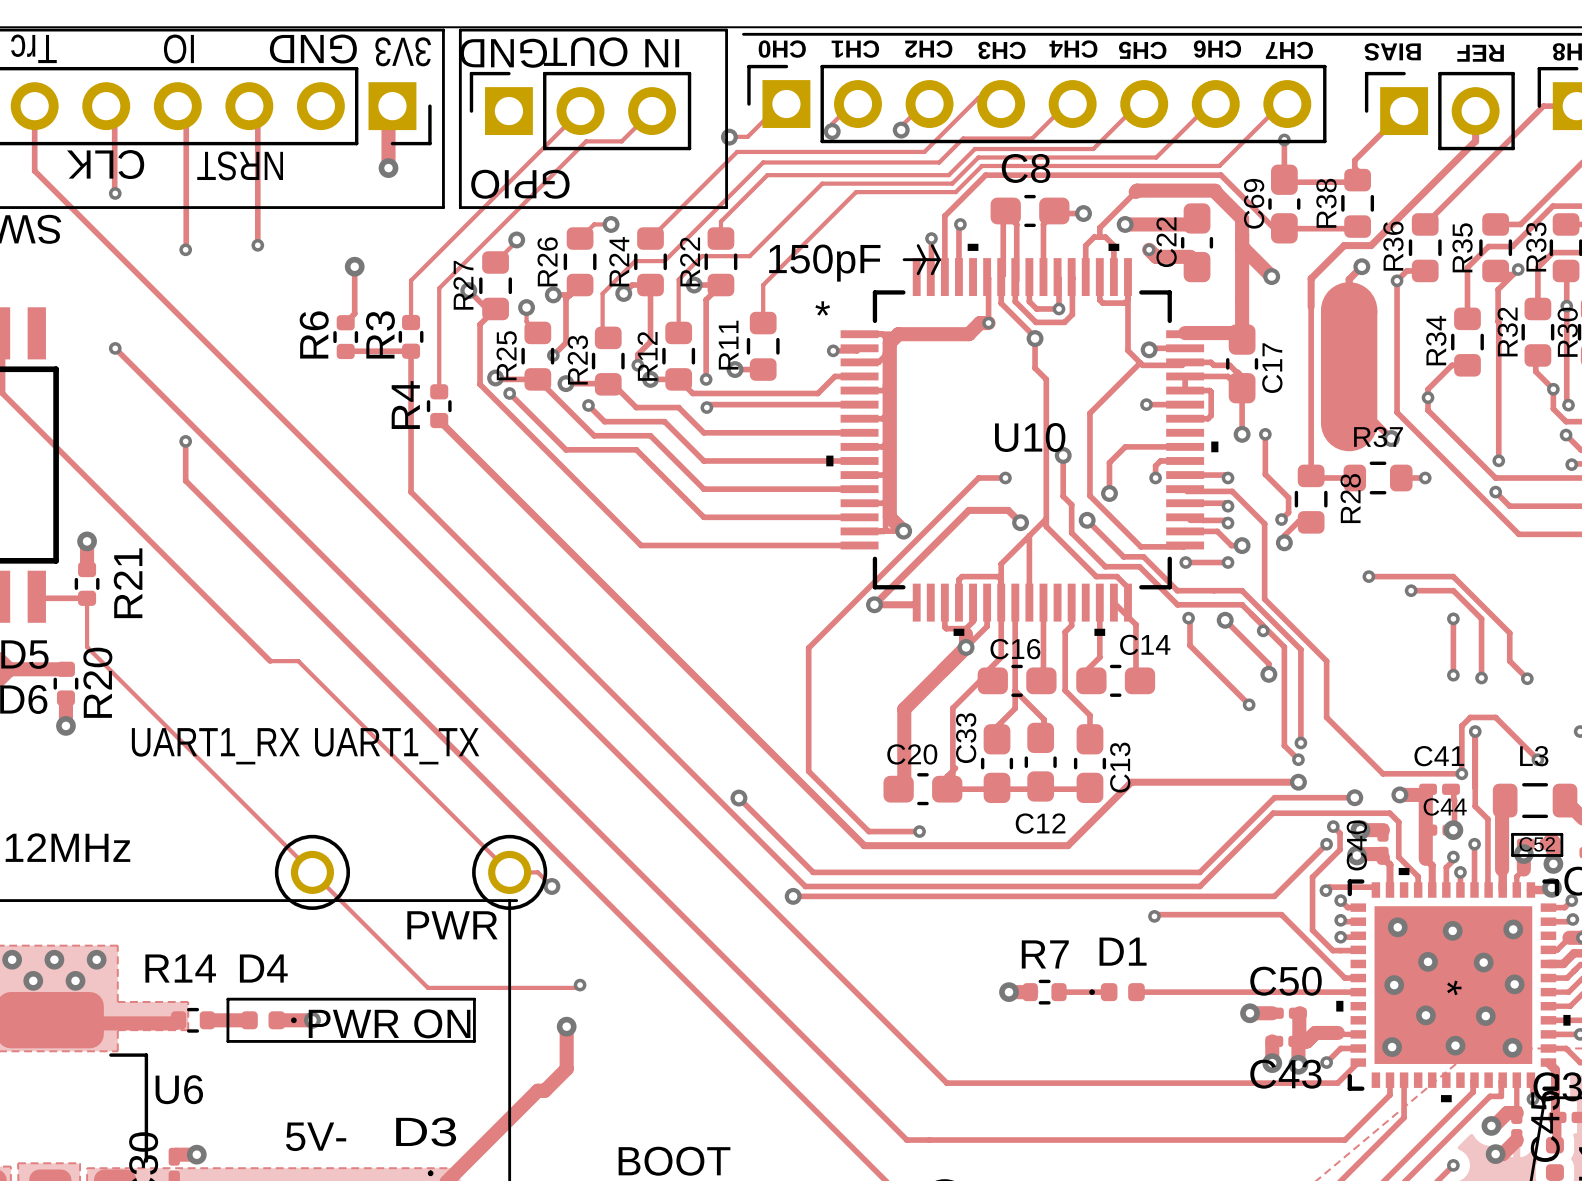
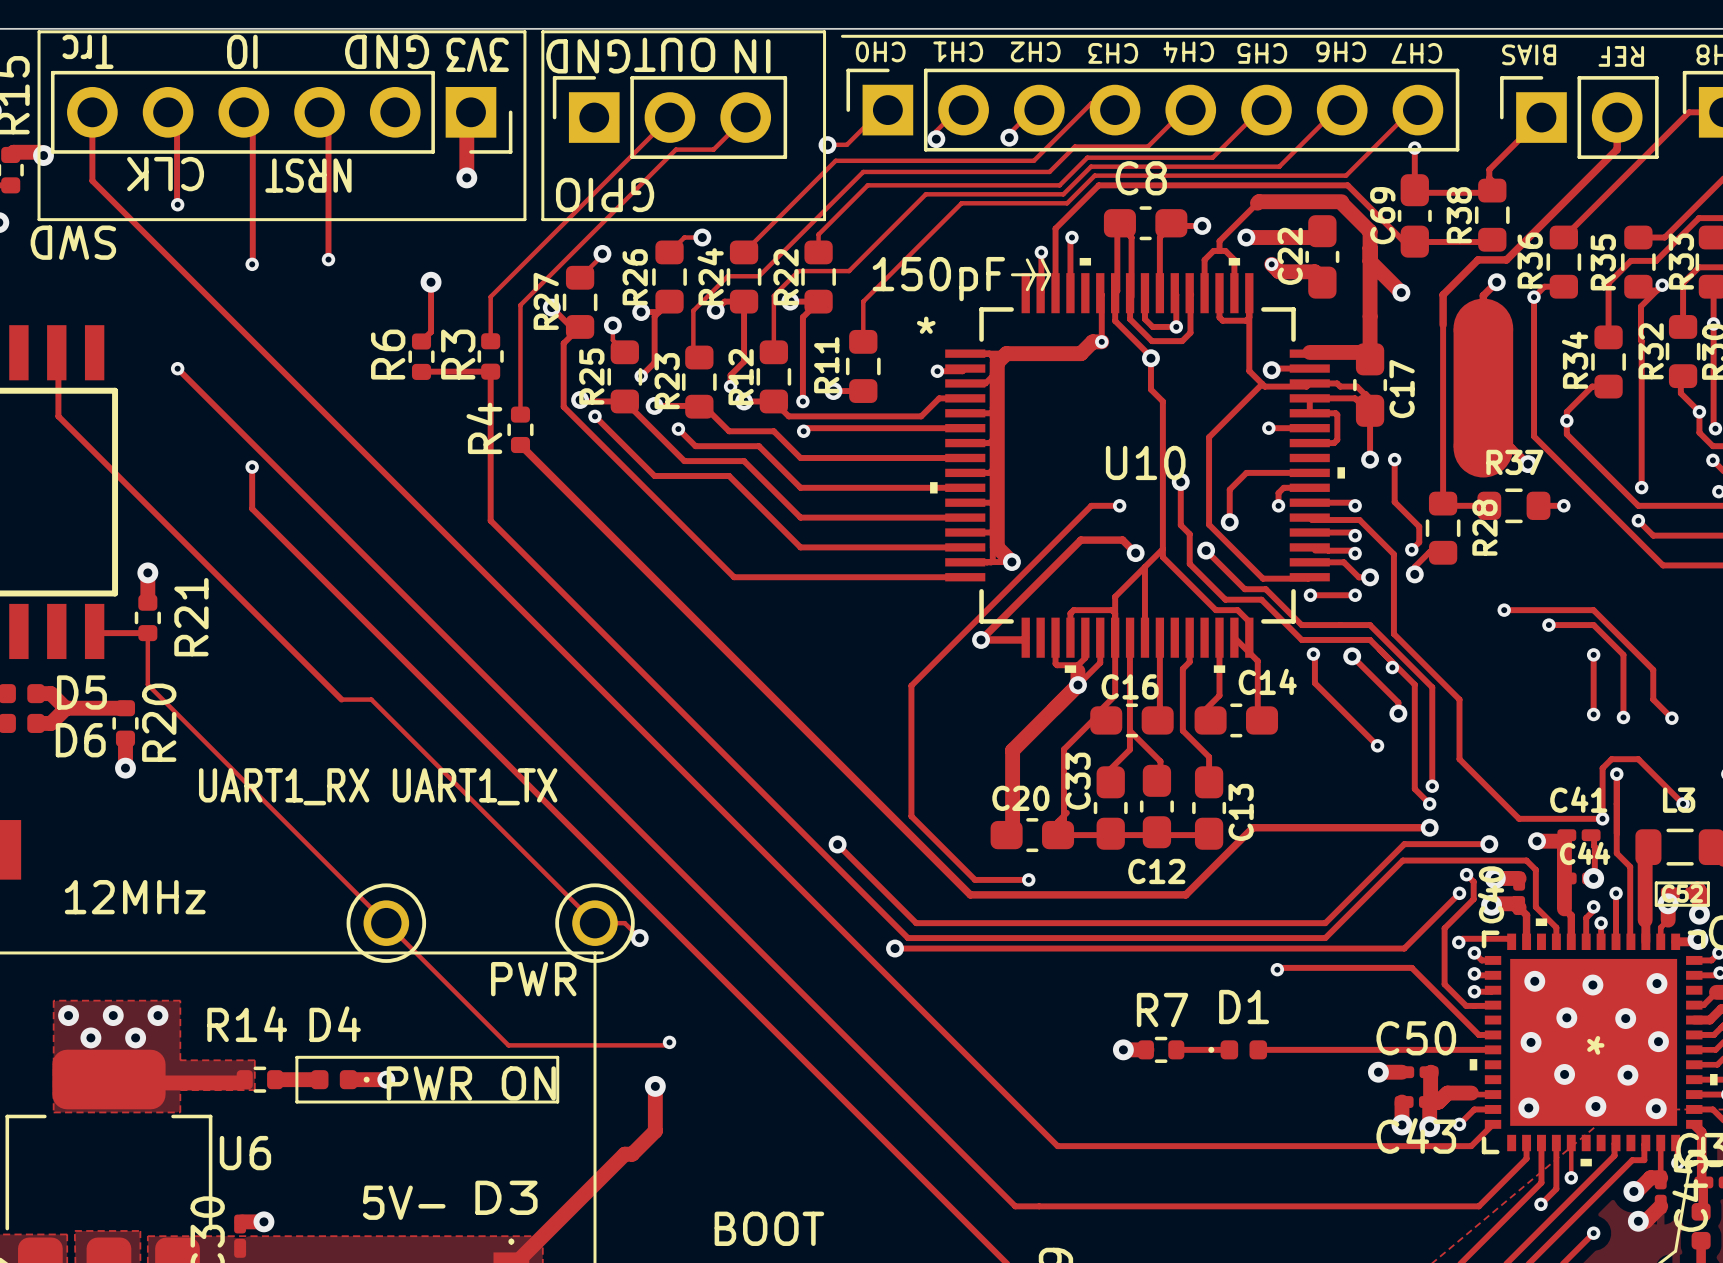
track: none -> (1556, 1143) (1556, 1188) (1540, 1204)
track: none -> (1571, 1143) (1571, 1177)
via: none -> (1571, 1177)
via: none -> (1540, 1204)

